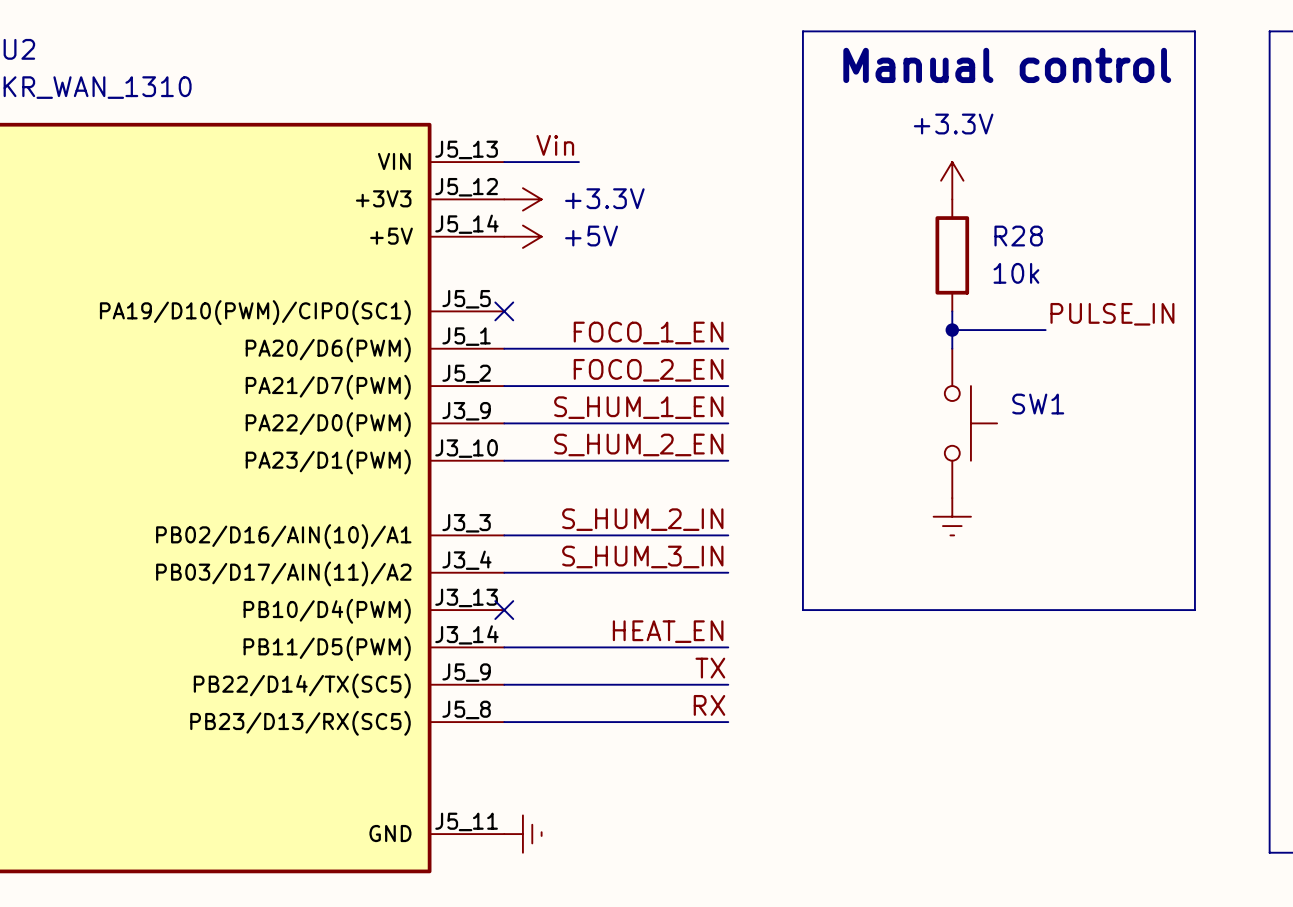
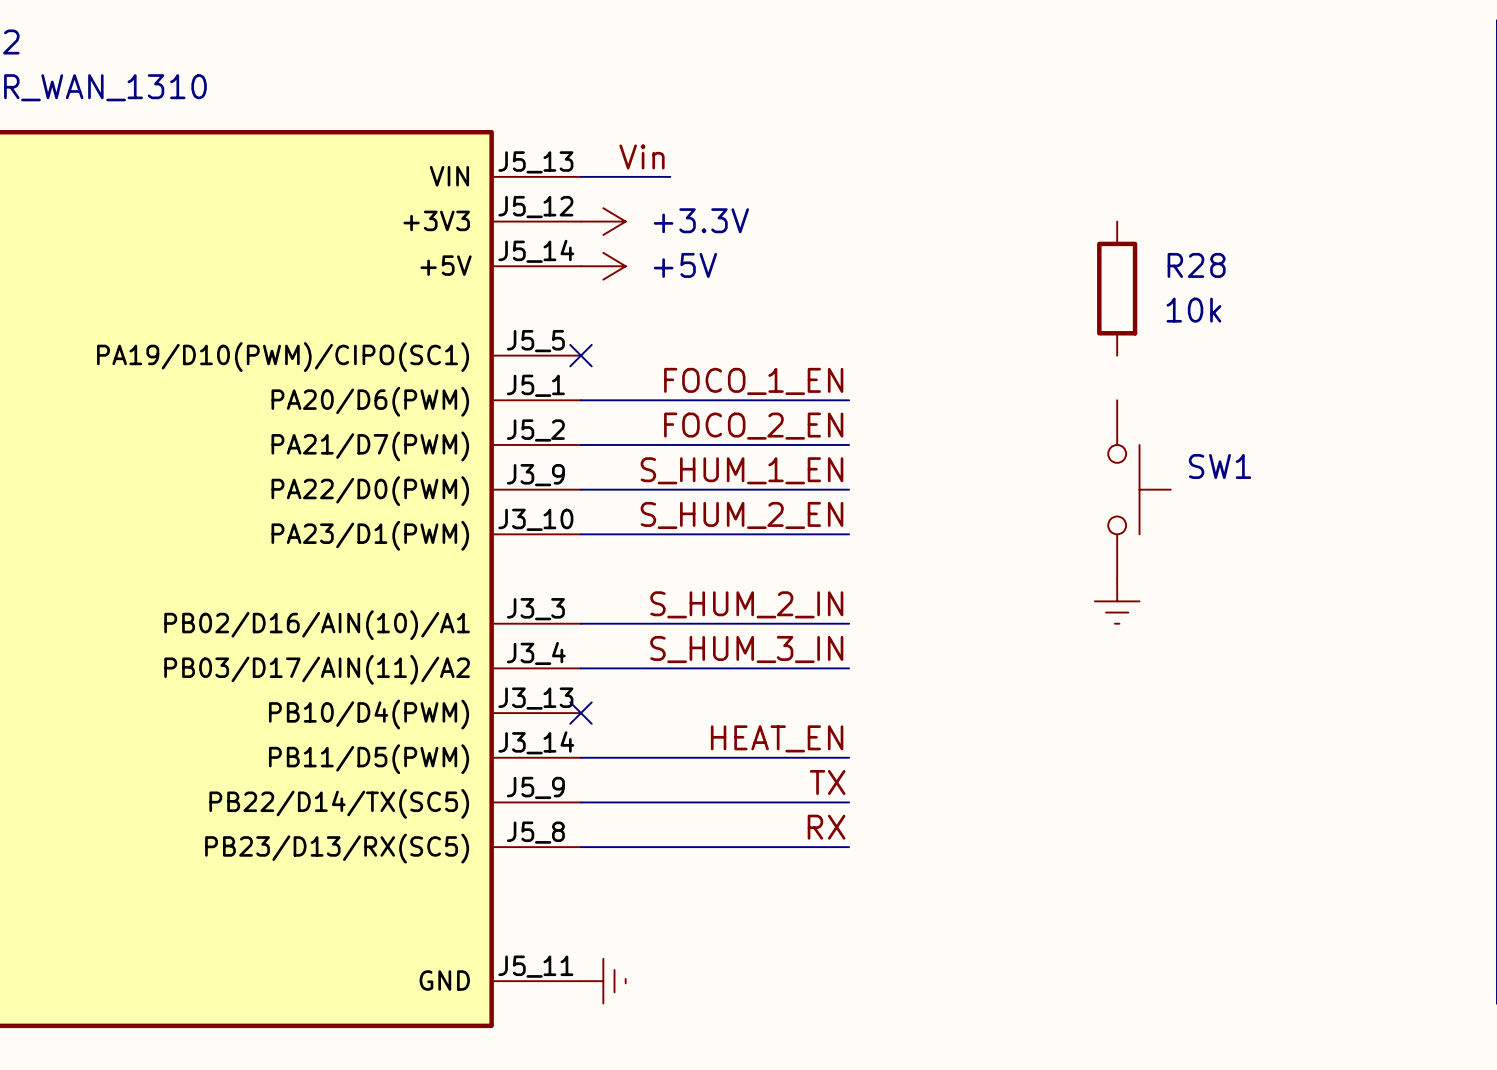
line: (802, 31) (802, 610) (1194, 610) (1194, 31) (802, 31) -> none
text: Manual control (1007, 65) -> none
power symbol: +3.3V (952, 180) -> none
wire: (952, 311) (952, 348) -> none
label: PULSE_IN (1112, 314) -> none
wire: (952, 330) (1045, 330) -> none
junction: (952, 330) -> none

